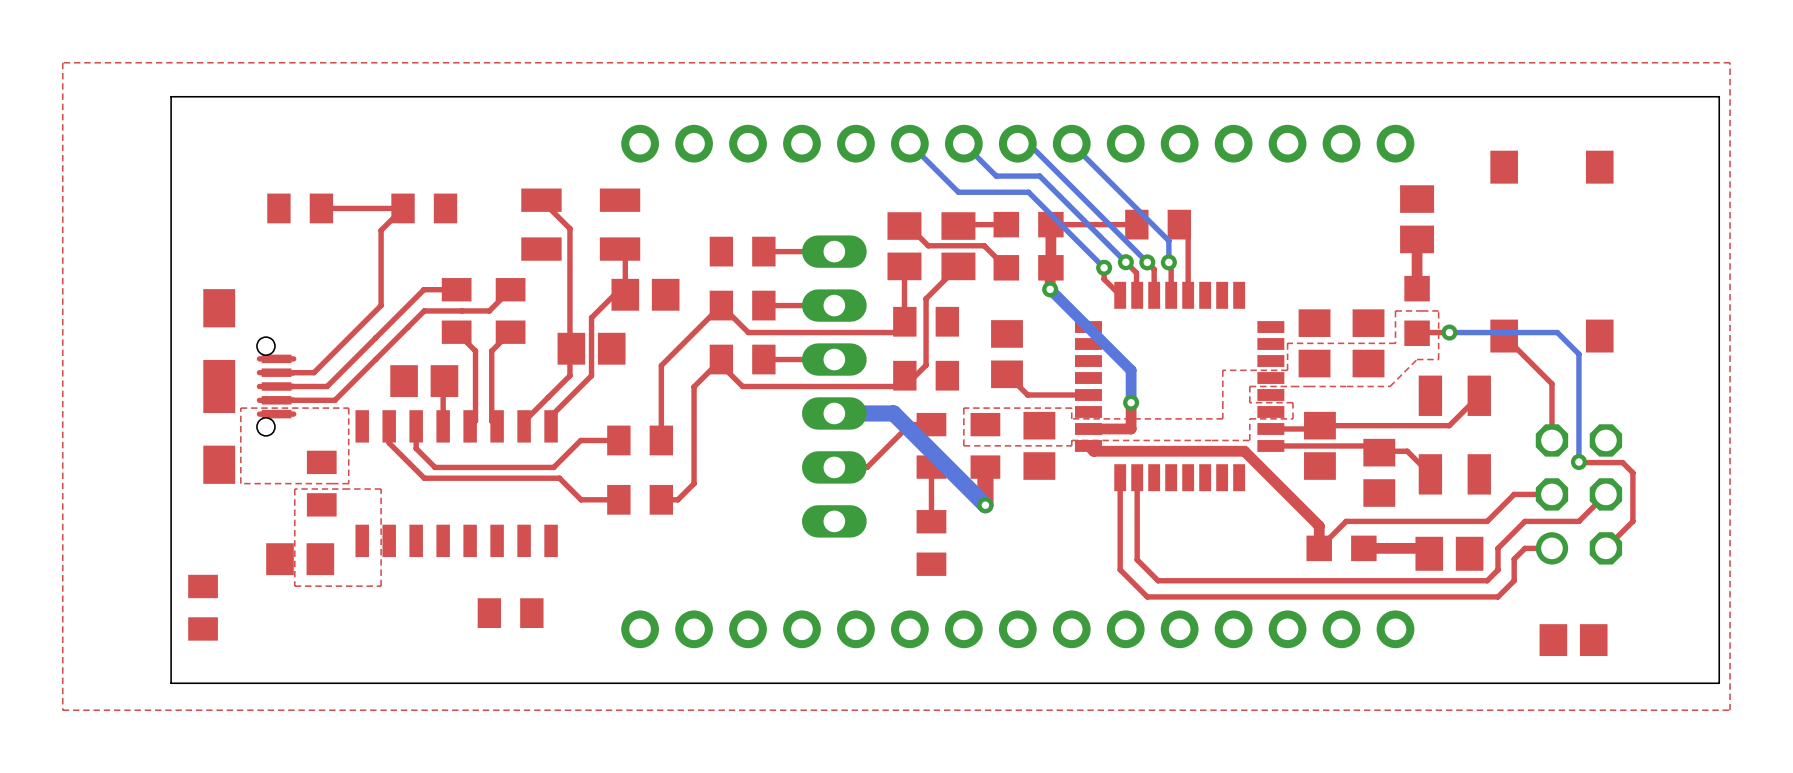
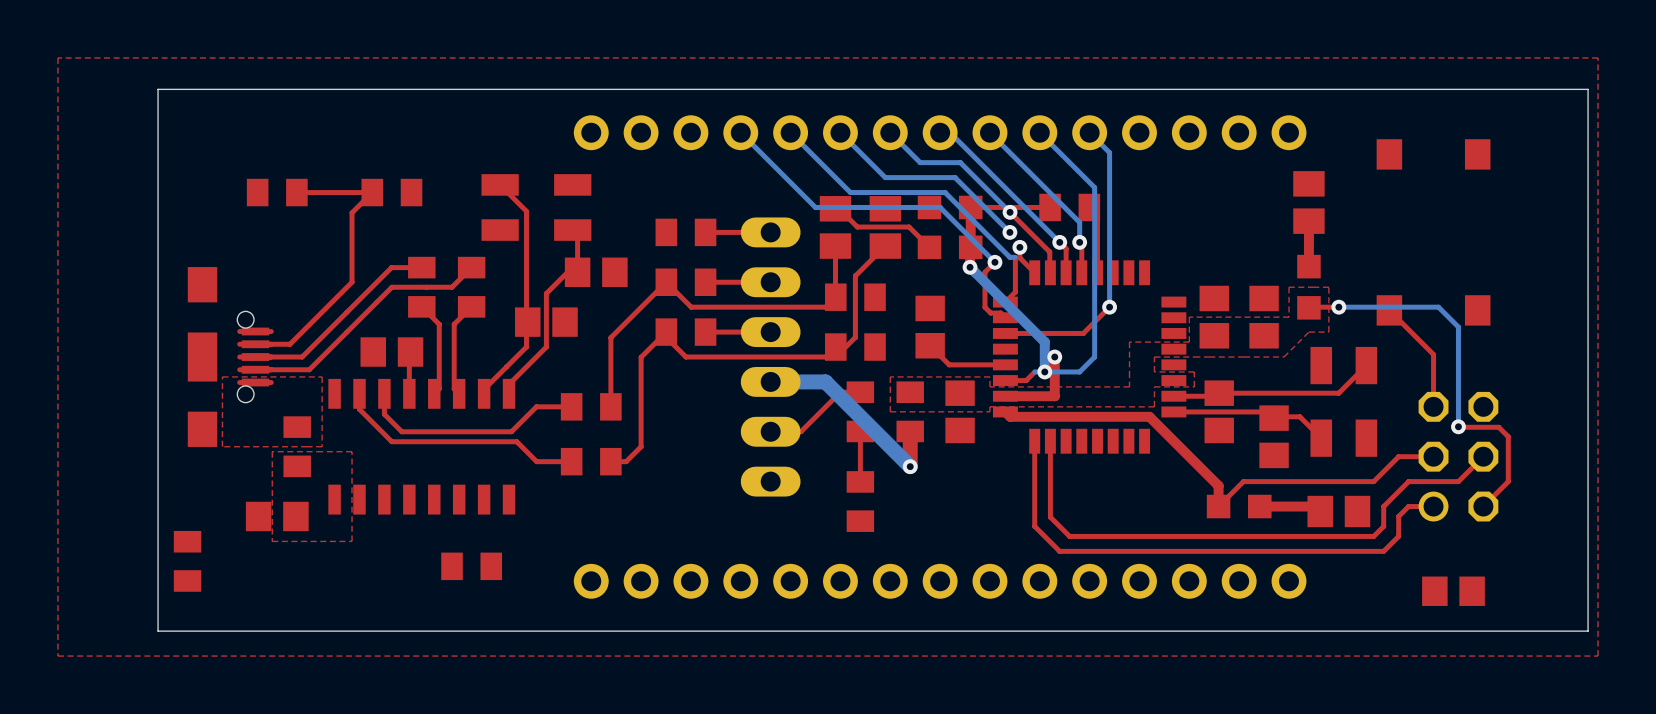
bottom track: none -> (740, 132) (815, 207) (940, 207) (994, 262)
bottom track: none -> (790, 132) (850, 192) (945, 192) (1009, 257) (1014, 257)
bottom track: none -> (1039, 132) (1094, 187) (1094, 357) (1079, 371) (1034, 371)
bottom track: none -> (1089, 132) (1109, 152) (1109, 307)
bottom track: (1028, 192) (1104, 267) -> (950, 177) (955, 177) (1009, 232)
top track: none -> (1010, 212) (1039, 242)
bottom track: (1093, 229) (1125, 262) -> none
via: none -> (1010, 212)
via: none -> (1009, 232)
via: (1125, 262) -> none
top track: none -> (1014, 257) (1015, 292) (1005, 302)
top track: none -> (994, 262) (984, 272) (984, 307) (990, 313) (1000, 313) (1005, 317)
via: none -> (994, 262)
top track: none -> (1109, 307) (1083, 333) (1005, 333)
via: none -> (1109, 307)
via: none -> (1054, 357)
top track: none -> (1034, 371) (1026, 380) (1005, 380)
top track: (1131, 402) (1131, 428) -> (1054, 357) (1054, 396) (1044, 396)

